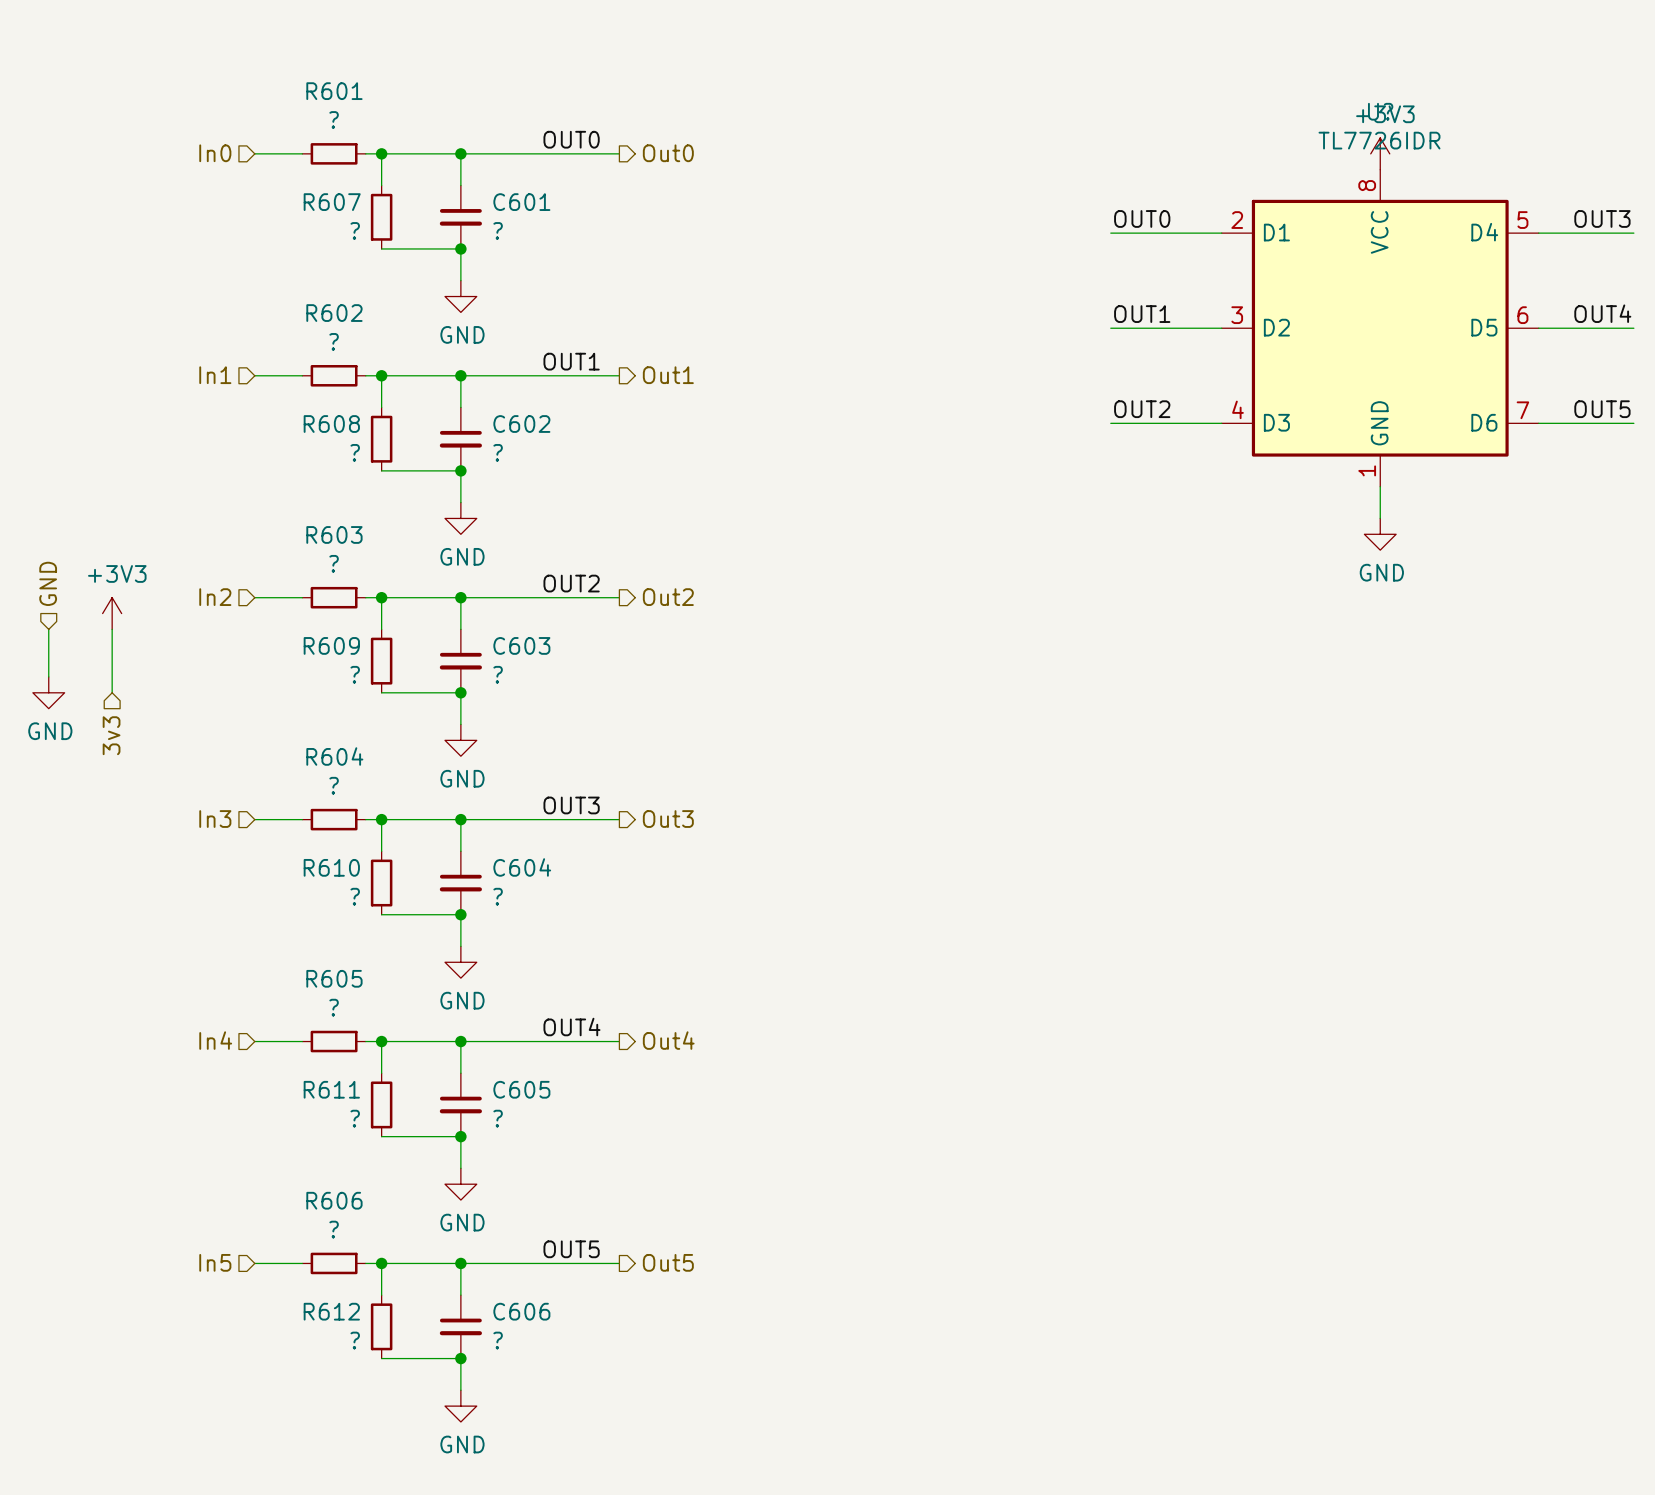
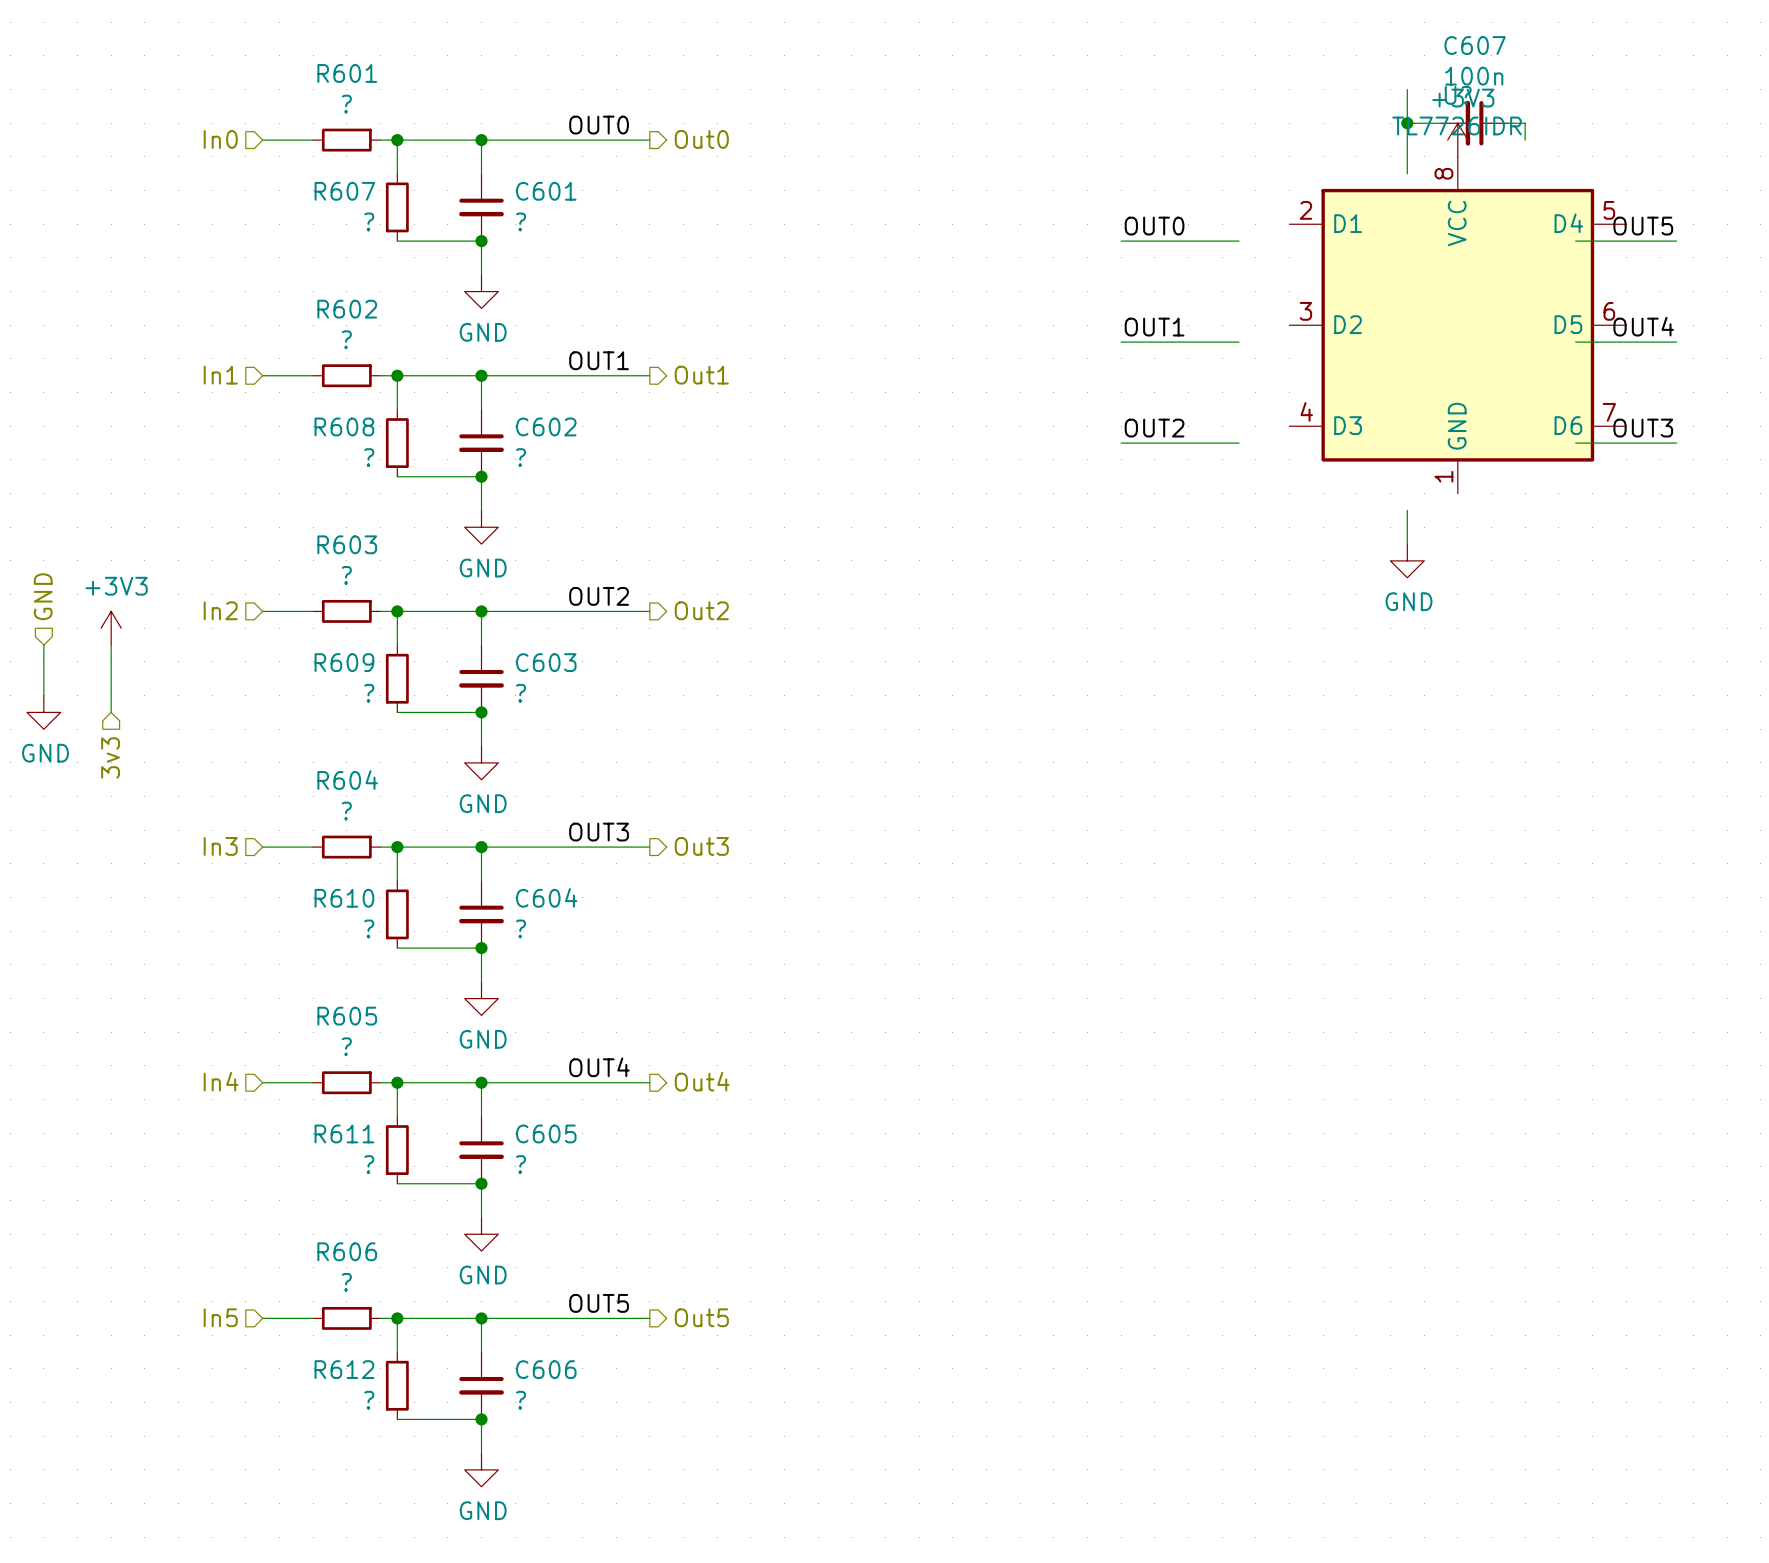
wire: none -> (1407, 89) (1407, 173)
wire: none -> (1407, 123) (1440, 123)
junction: none -> (1407, 123)
C607: none -> 100n (1474, 123)
wire: none -> (1508, 123) (1525, 123) (1525, 140)
label position: OUT0 (1142, 218) -> OUT0 (1154, 226)
label position: OUT3 (1602, 218) -> OUT3 (1643, 428)
wire: (1110, 233) (1221, 233) -> (1121, 241) (1238, 241)
wire: (1538, 233) (1633, 233) -> (1575, 241) (1676, 241)
label position: OUT4 (1602, 313) -> OUT4 (1643, 326)
label position: OUT1 (1142, 314) -> OUT1 (1154, 327)
wire: (1110, 328) (1221, 328) -> (1121, 342) (1238, 342)
wire: (1538, 328) (1633, 328) -> (1575, 342) (1676, 342)
label position: OUT2 (1142, 409) -> OUT2 (1154, 428)
label position: OUT5 (1602, 409) -> OUT5 (1643, 226)
wire: (1110, 423) (1221, 423) -> (1121, 443) (1238, 443)
wire: (1538, 423) (1633, 423) -> (1575, 443) (1676, 443)
wire: (1380, 486) (1380, 518) -> (1407, 510) (1407, 544)
power symbol position: GND (1380, 534) -> GND (1407, 560)

